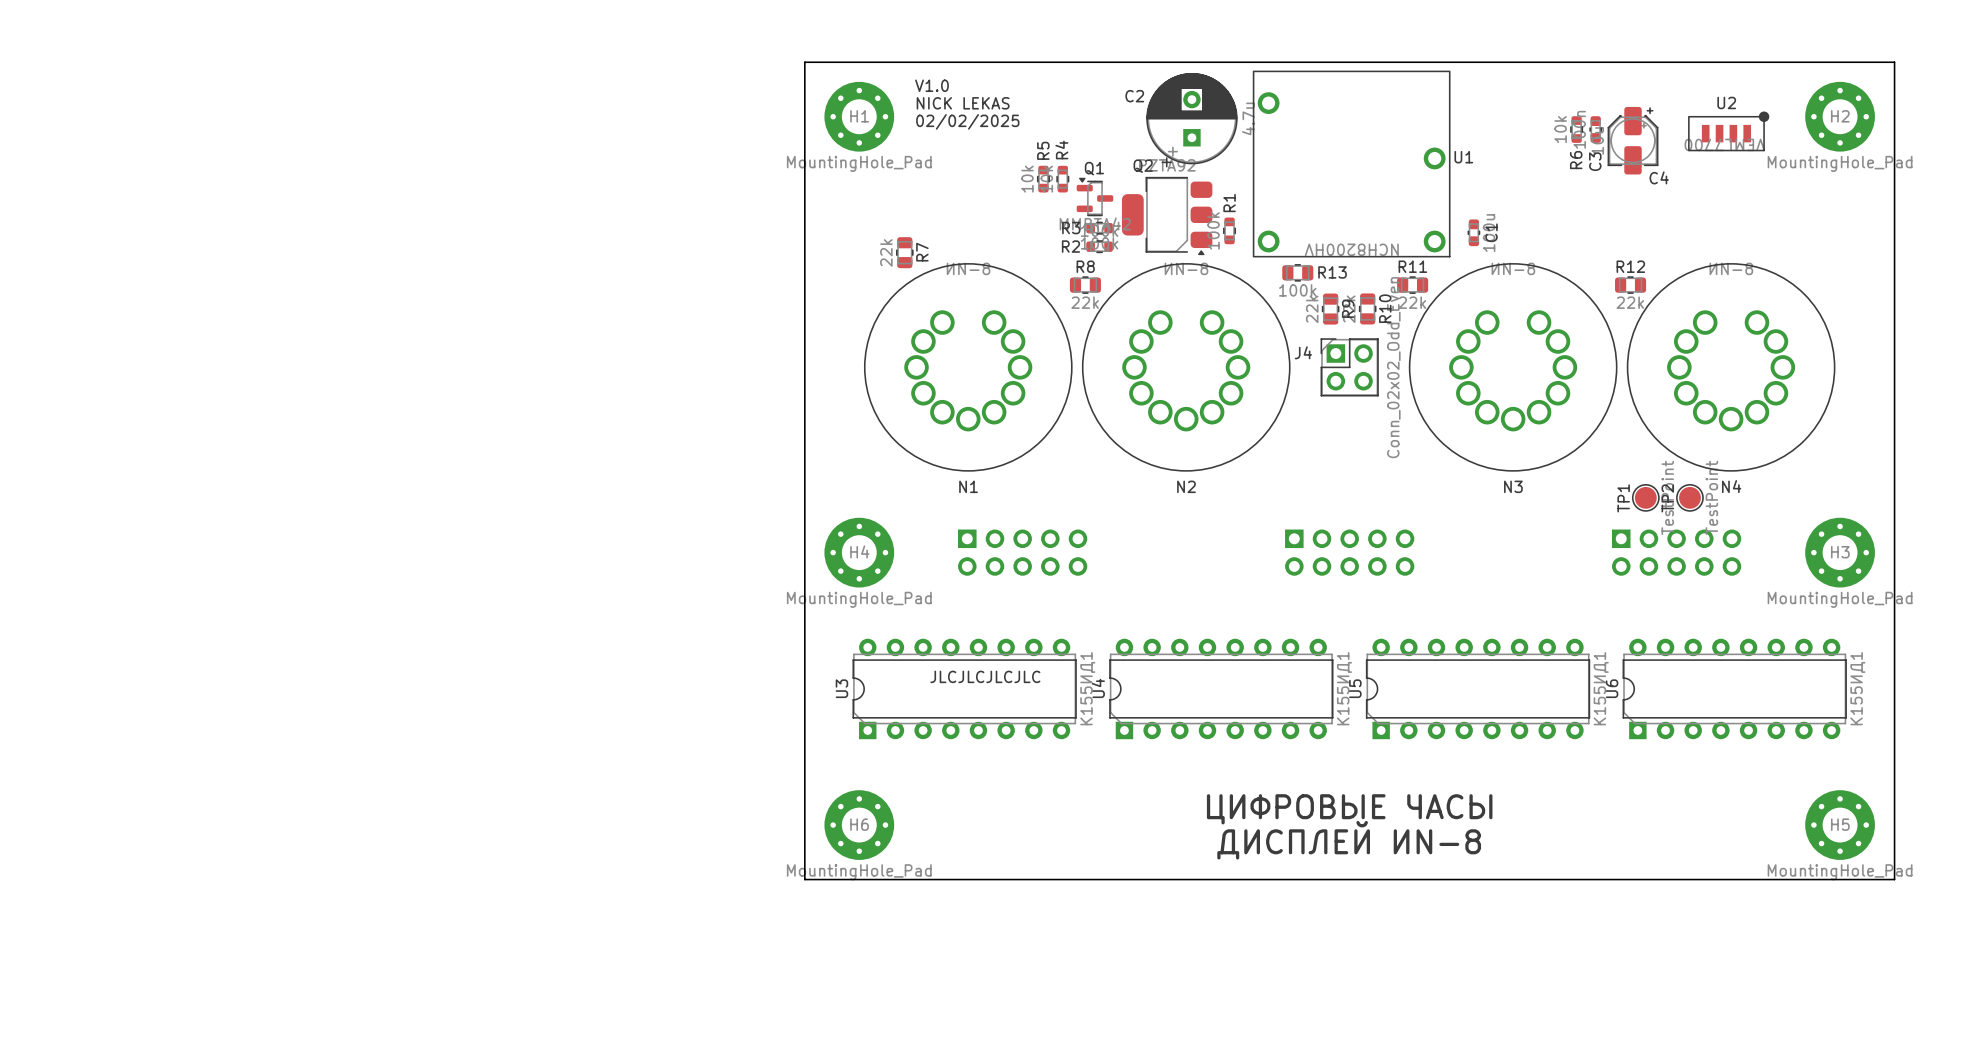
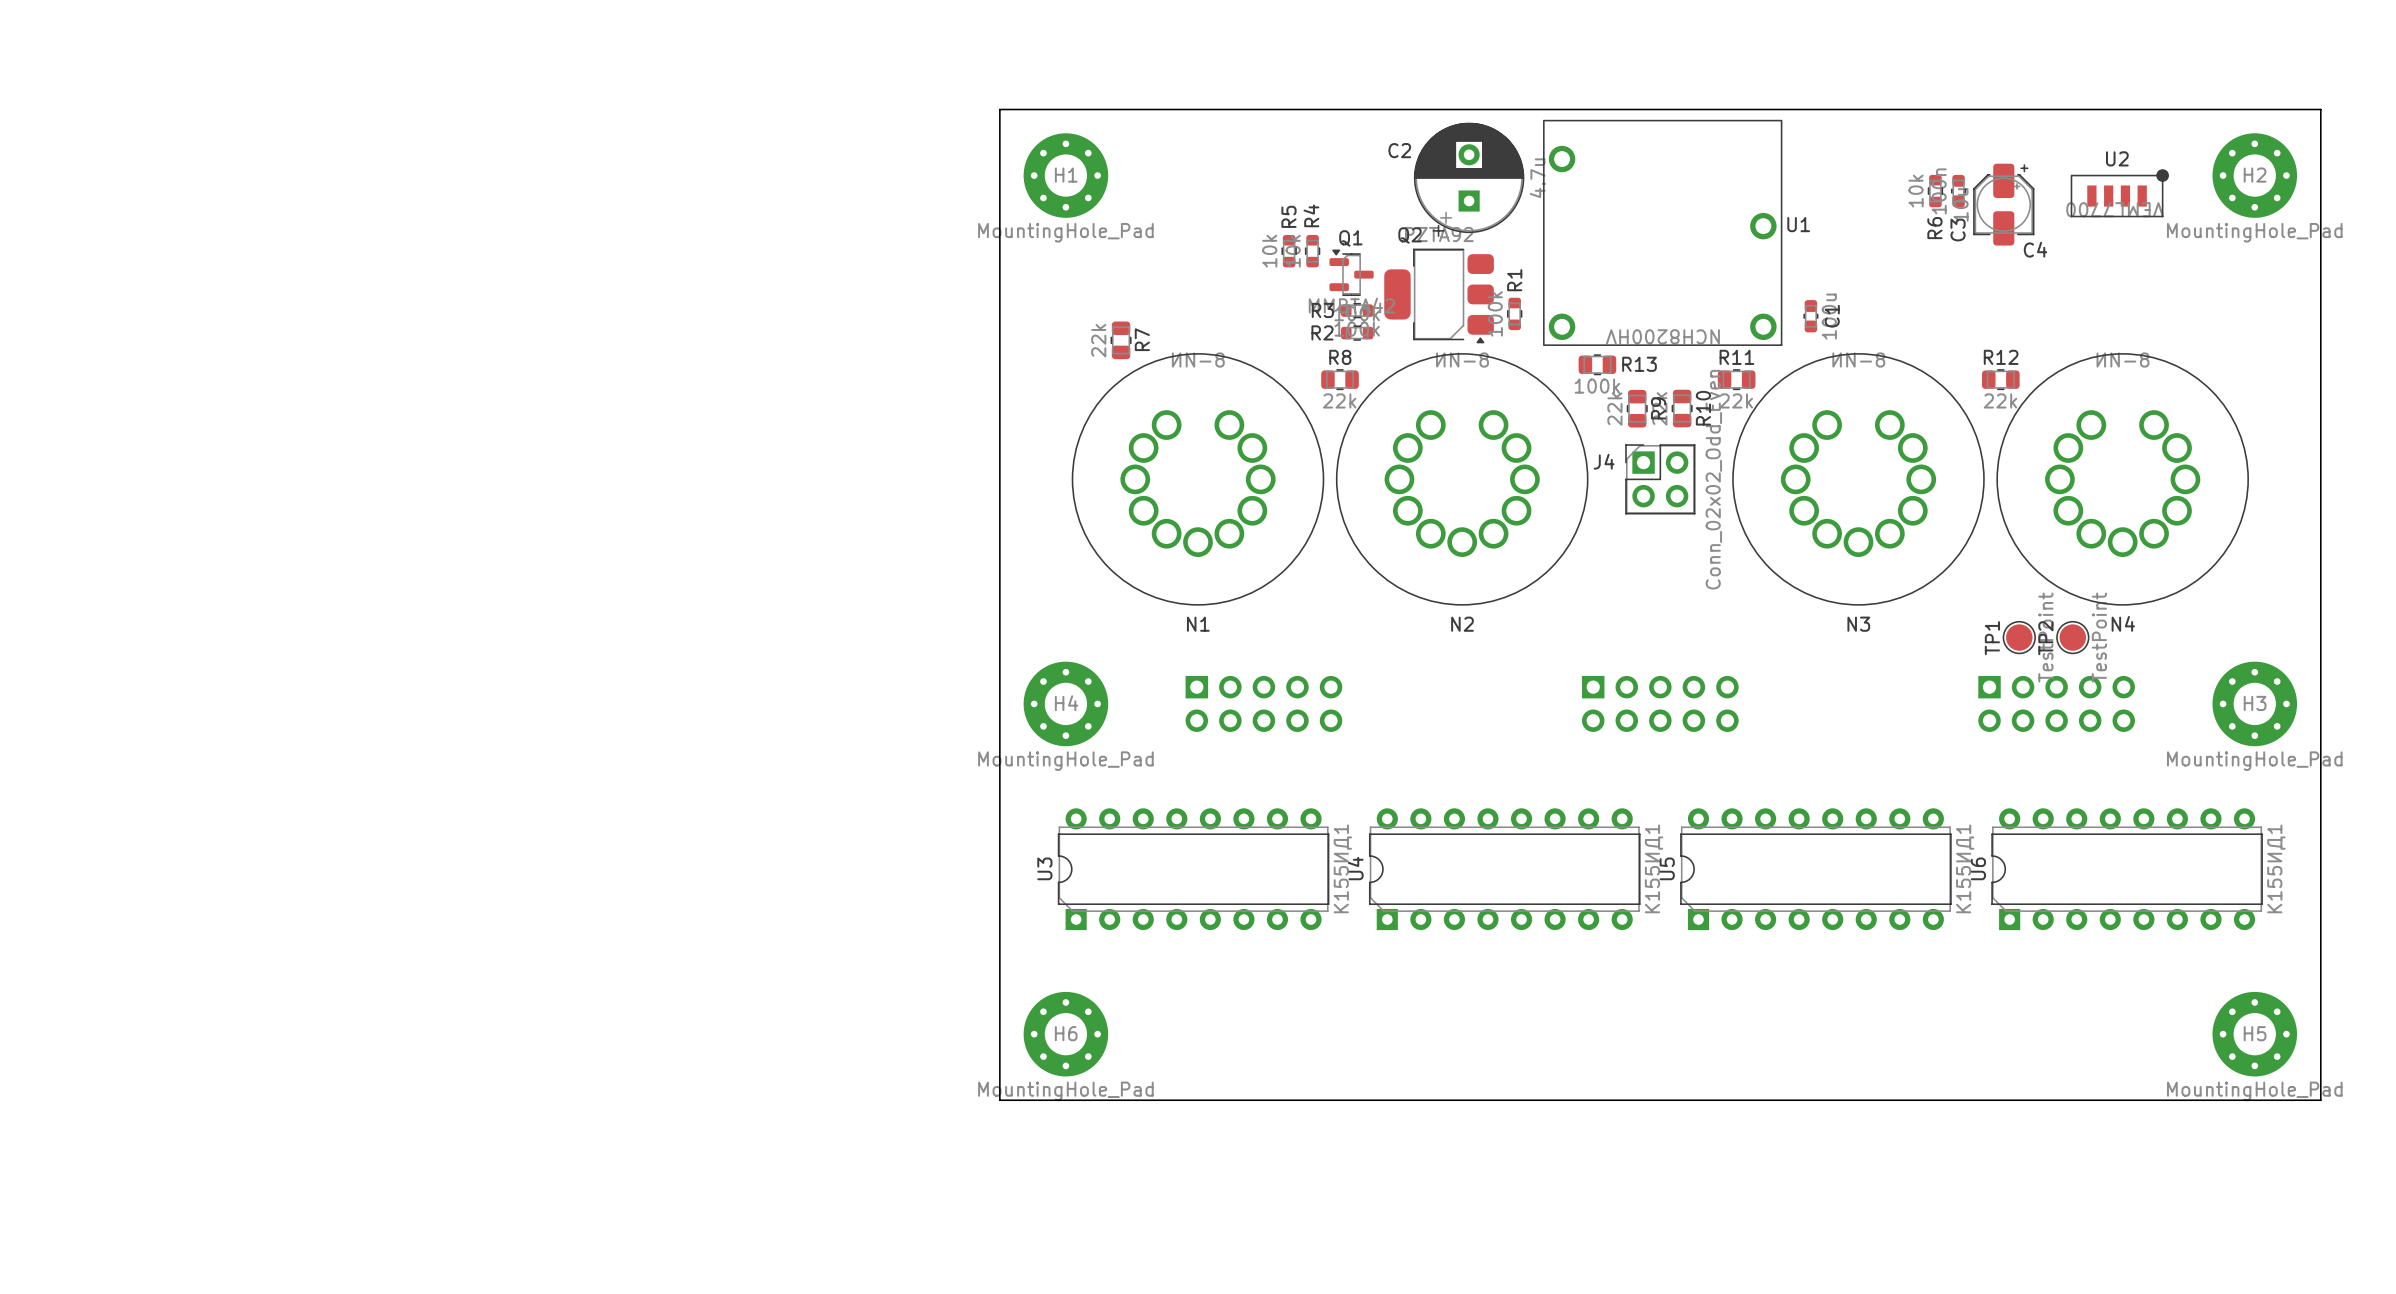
text: V1.0 (931, 85) -> none
text: NICK LEKAS (963, 103) -> none
text: 02/02/2025 (967, 121) -> none
text: JLCJLCJLCJLC (985, 676) -> none
text: ЦИФРОВЫЕ ЧАСЫ (1349, 809) -> none
text: ДИСПЛЕЙ ИN-8 (1349, 840) -> none

